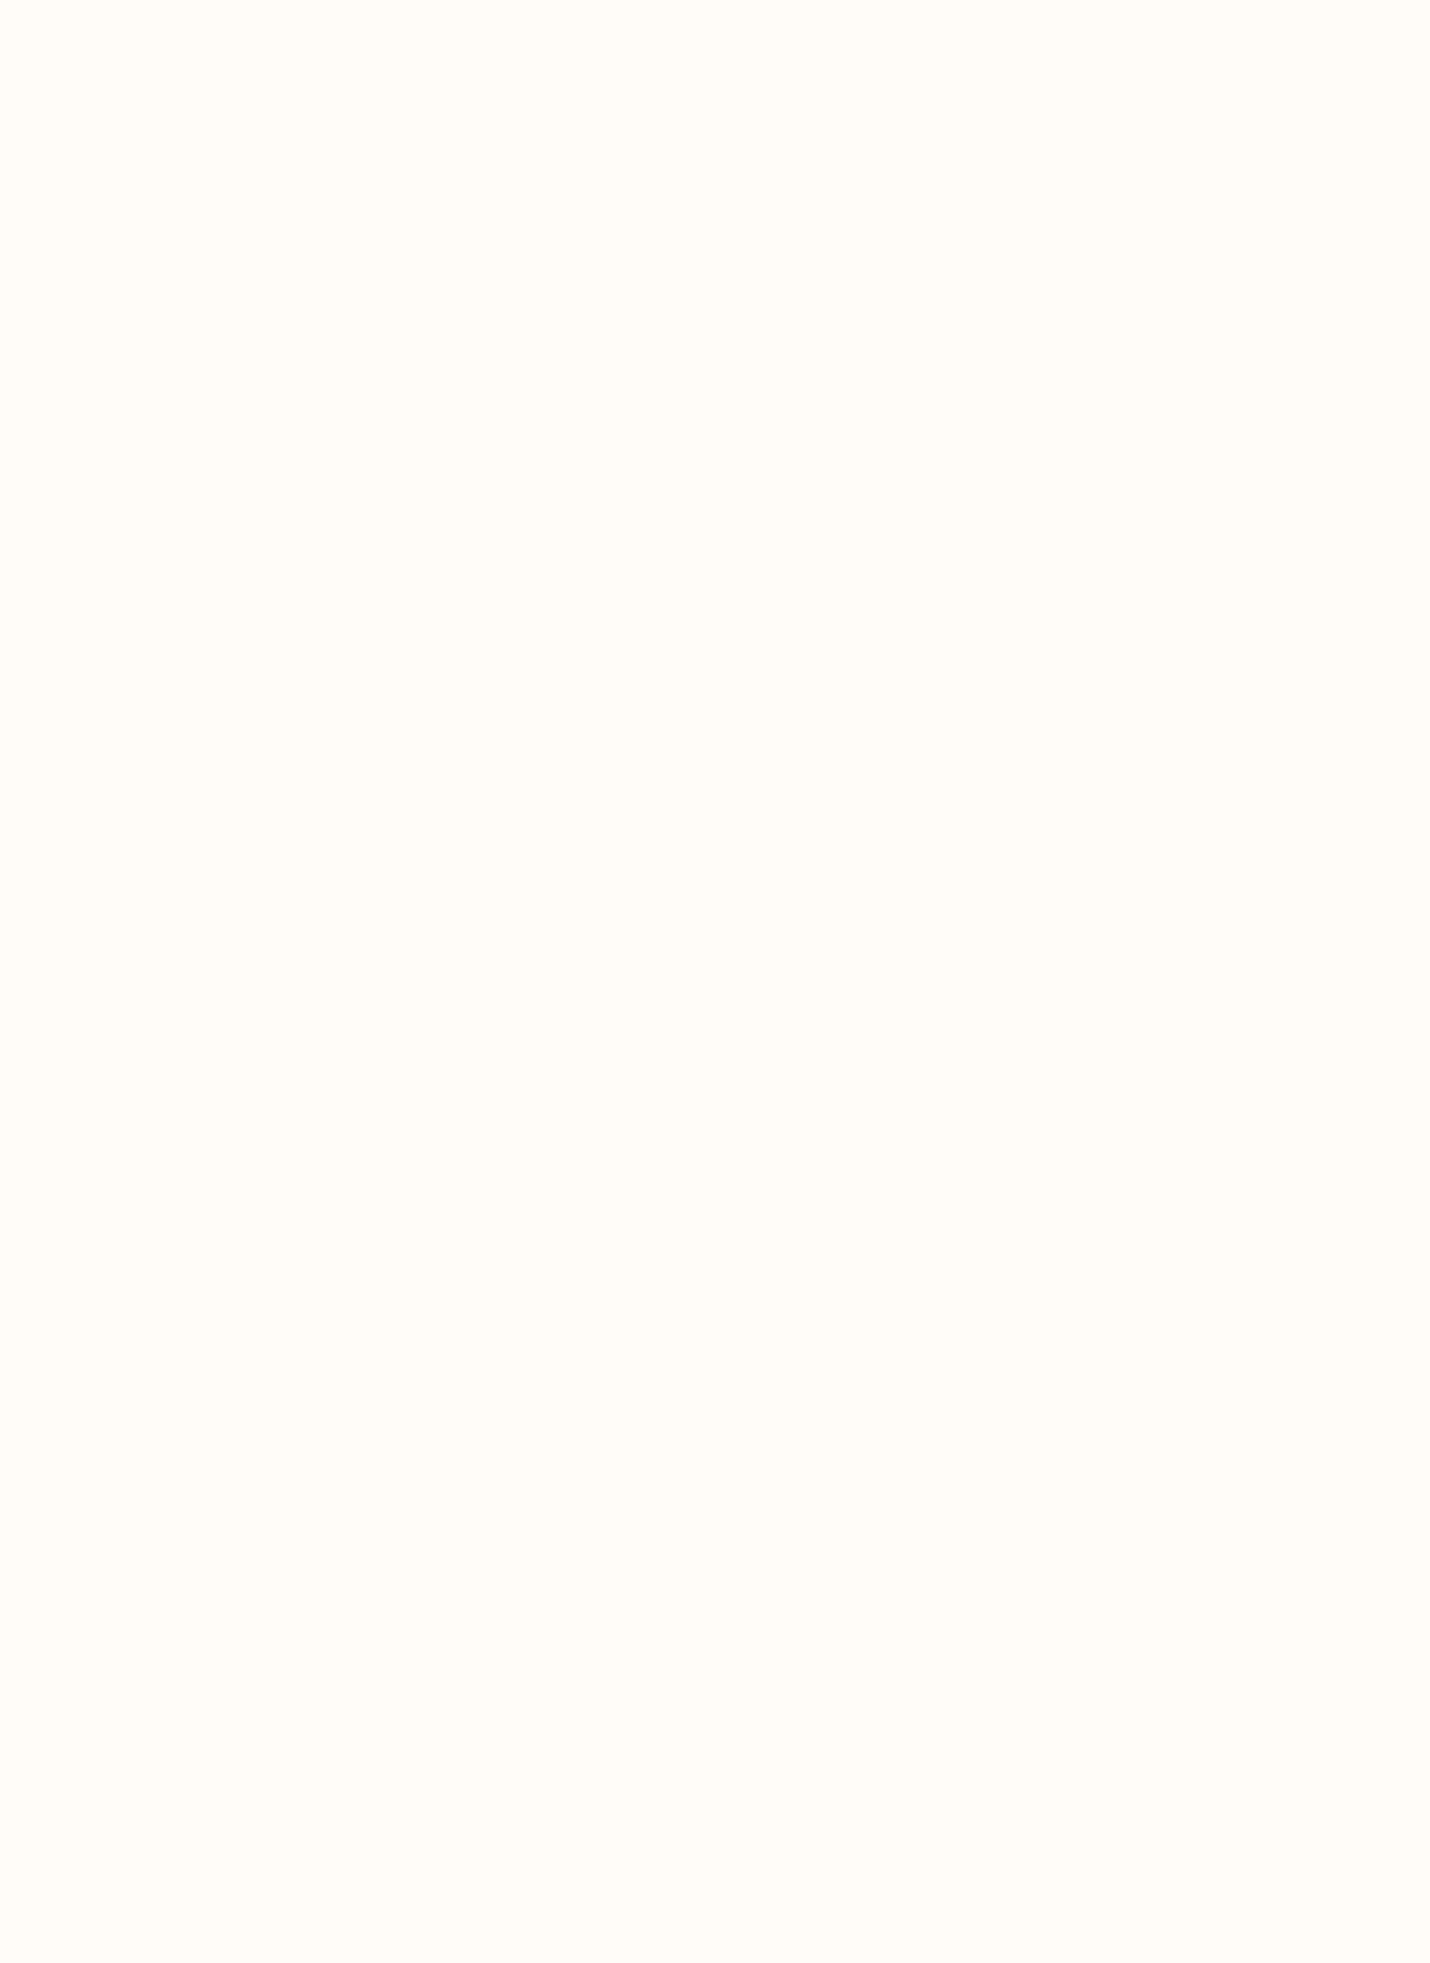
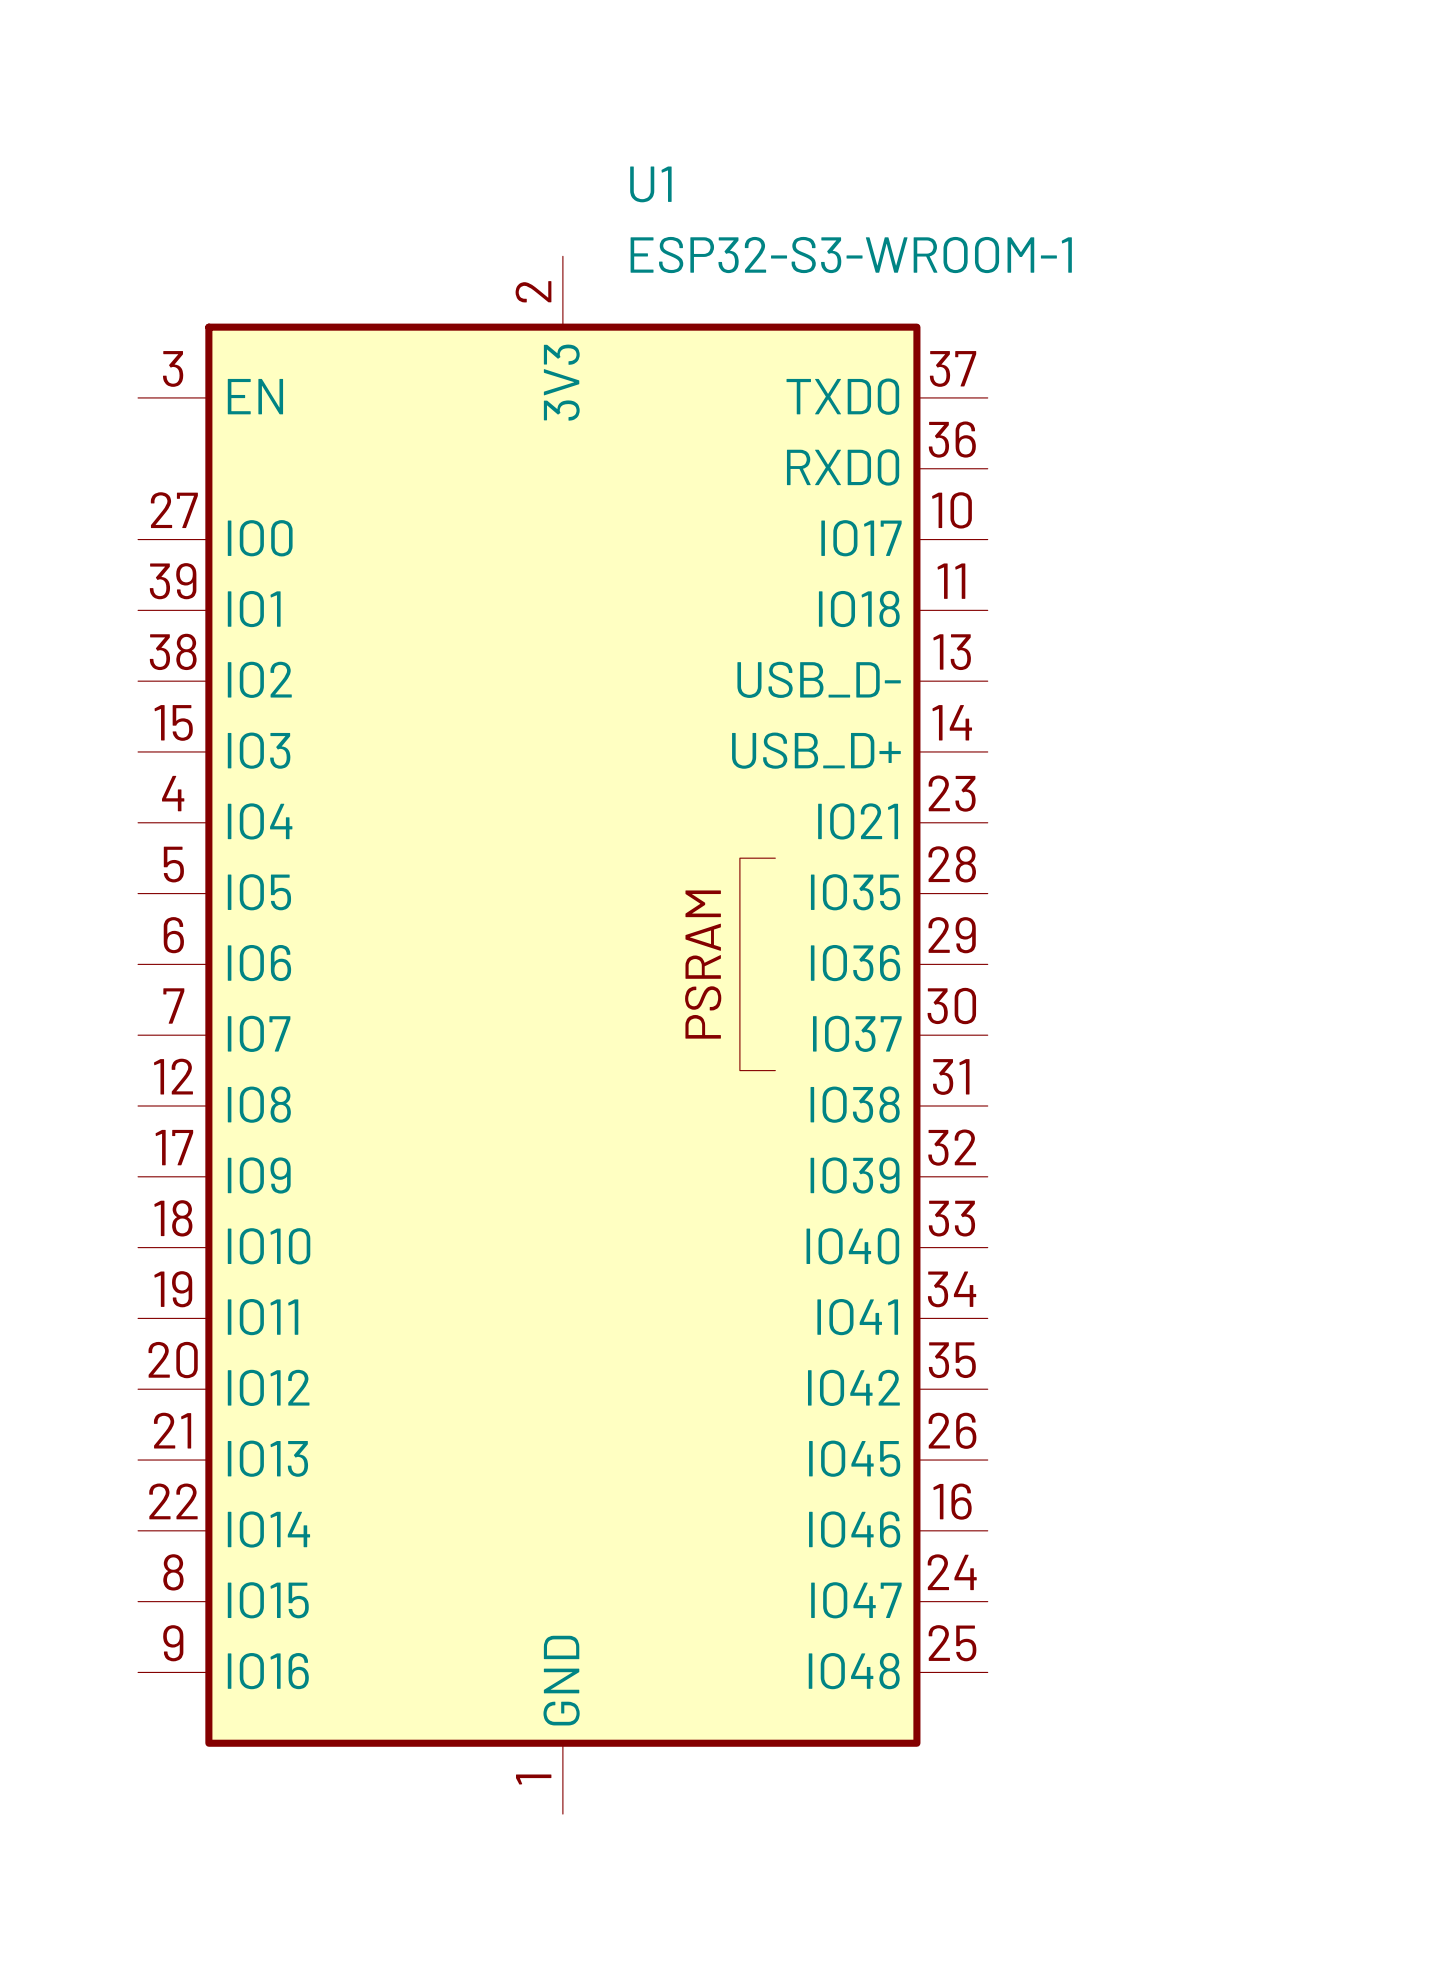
U1: none -> ESP32-S3-WROOM-1 (562, 1035)

